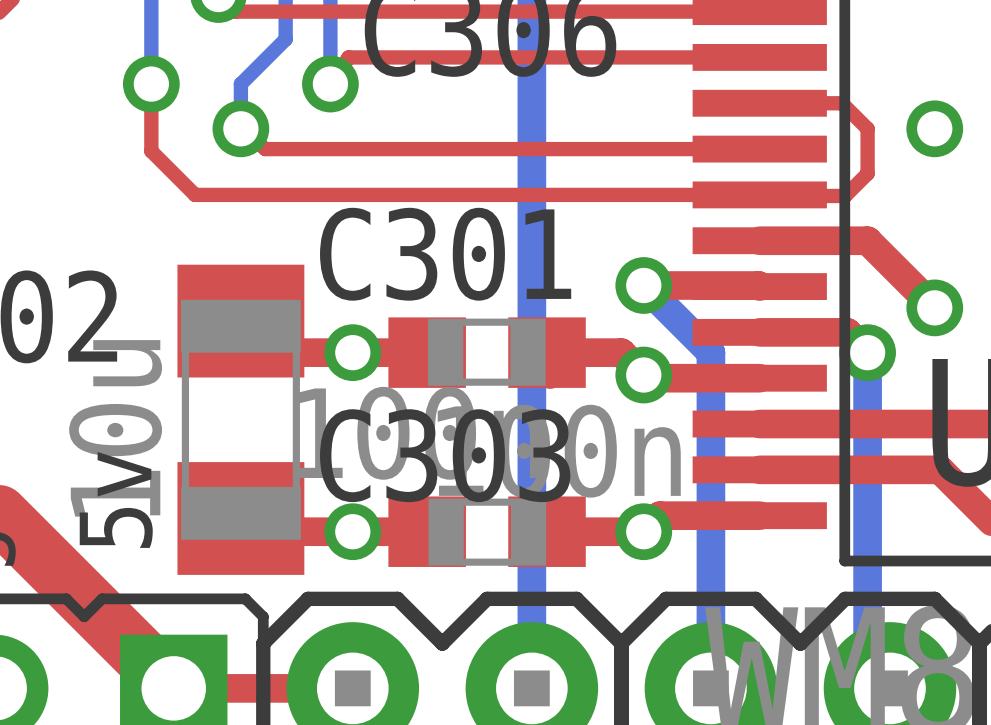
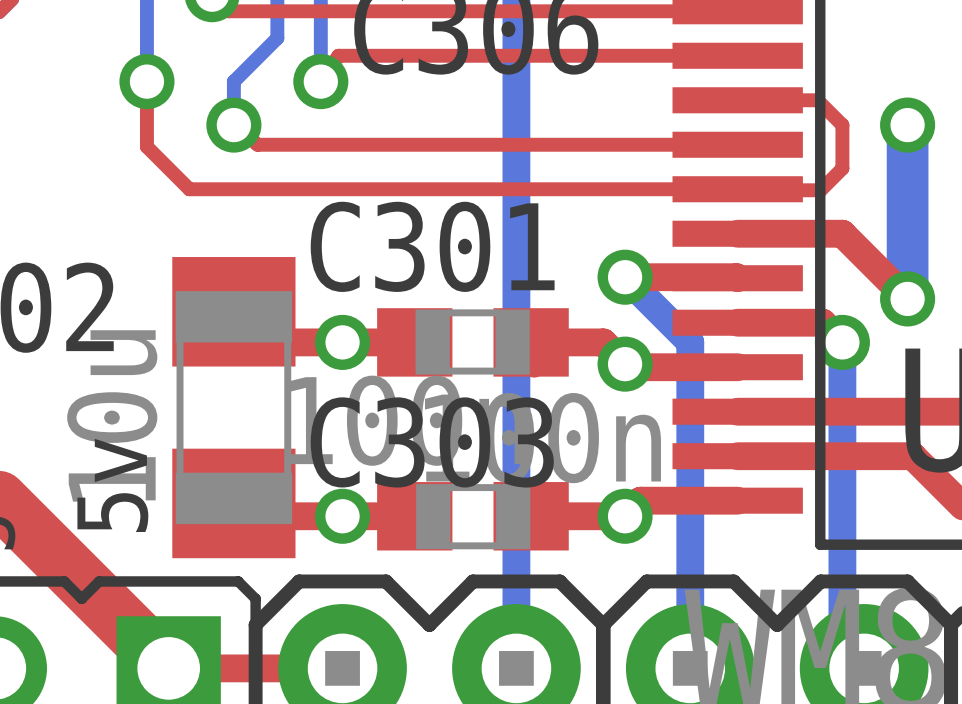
bottom track: none -> (907, 125) (907, 298)

